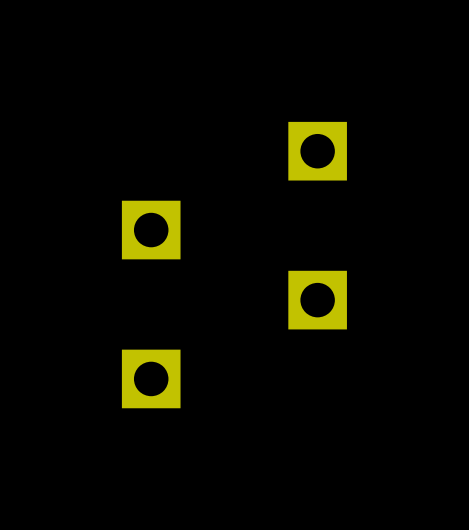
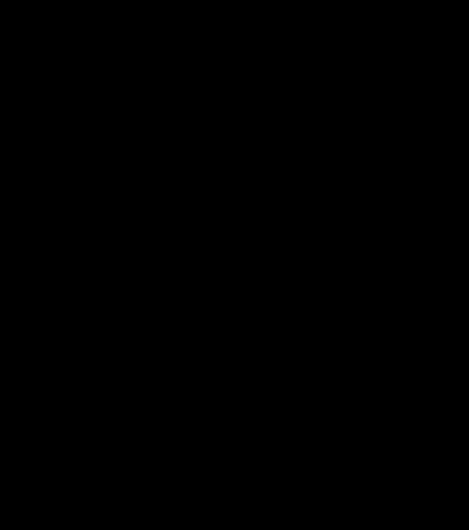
part: (317, 151) -> none
part: (151, 230) -> none
part: (317, 300) -> none
part: (151, 378) -> none

